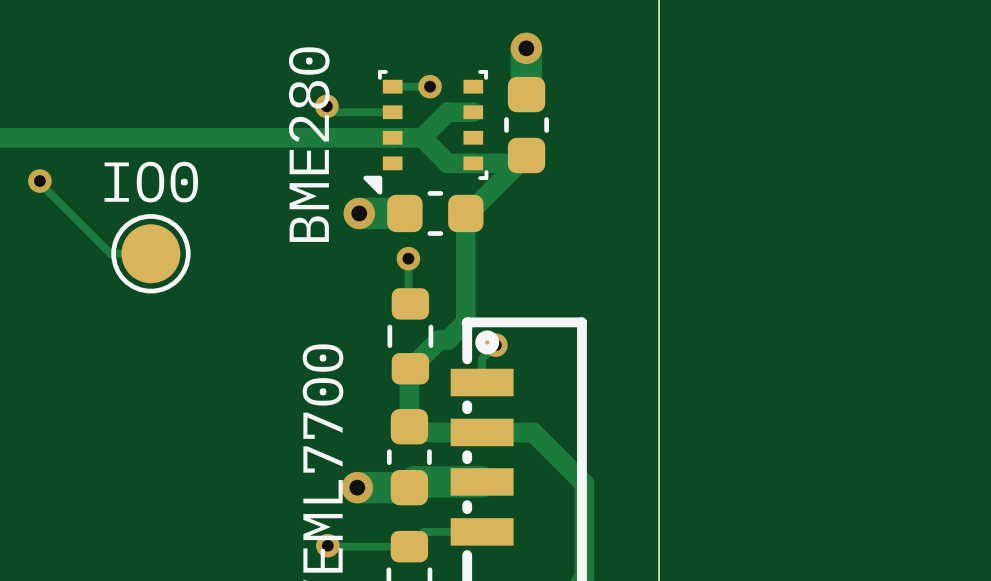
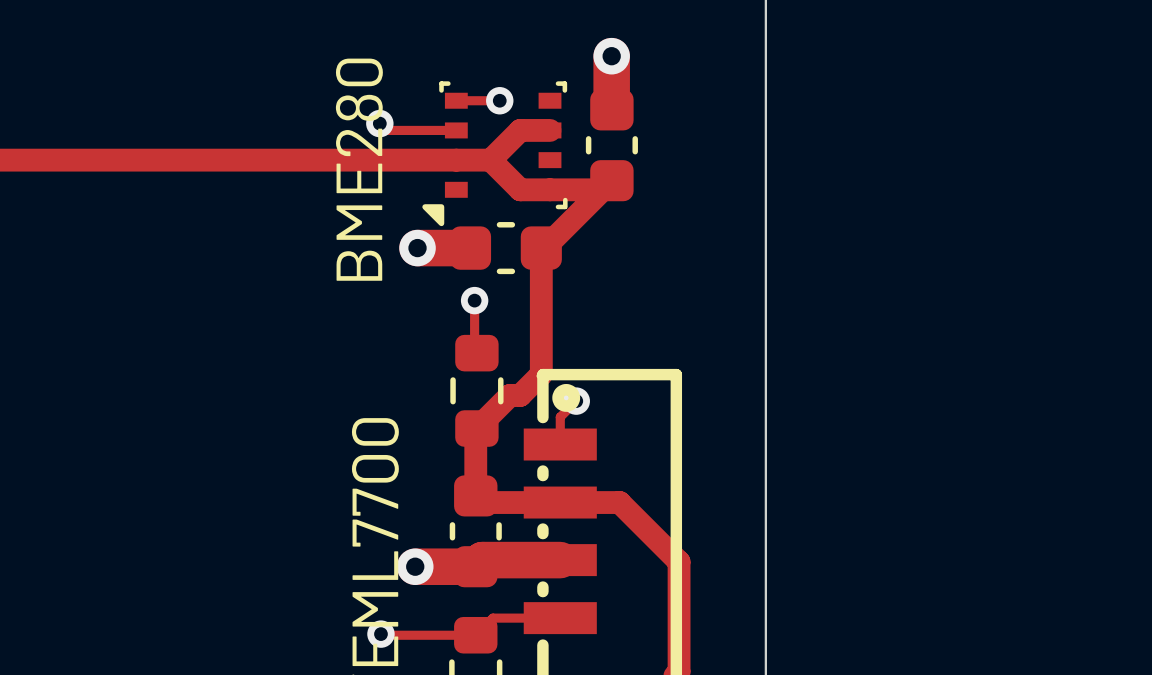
track: (39, 181) (110, 253) (150, 253) -> none
via: (39, 181) -> none
text: IO0 (151, 182) -> none
part: (150, 253) -> none

